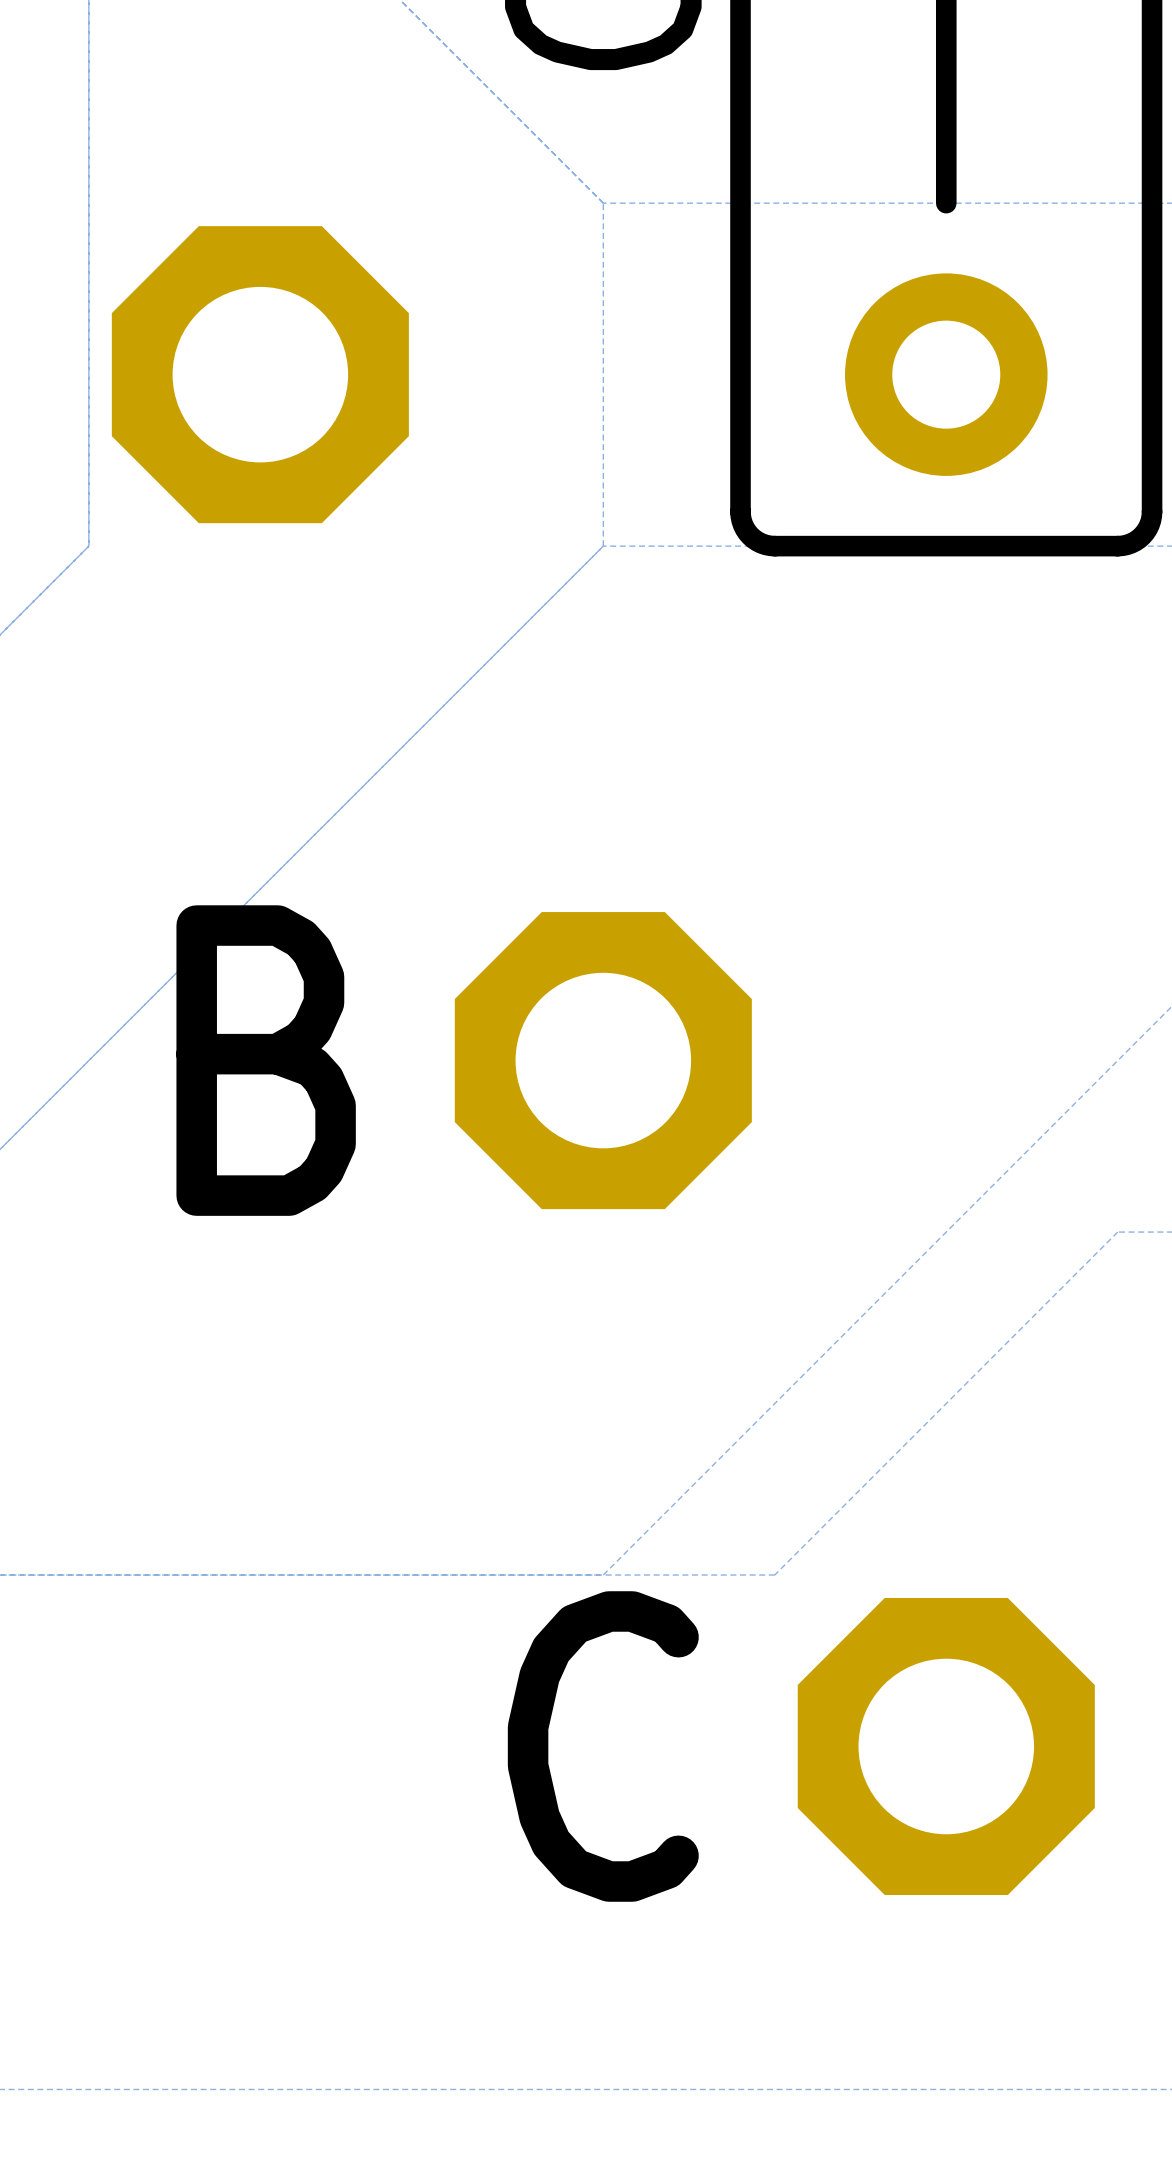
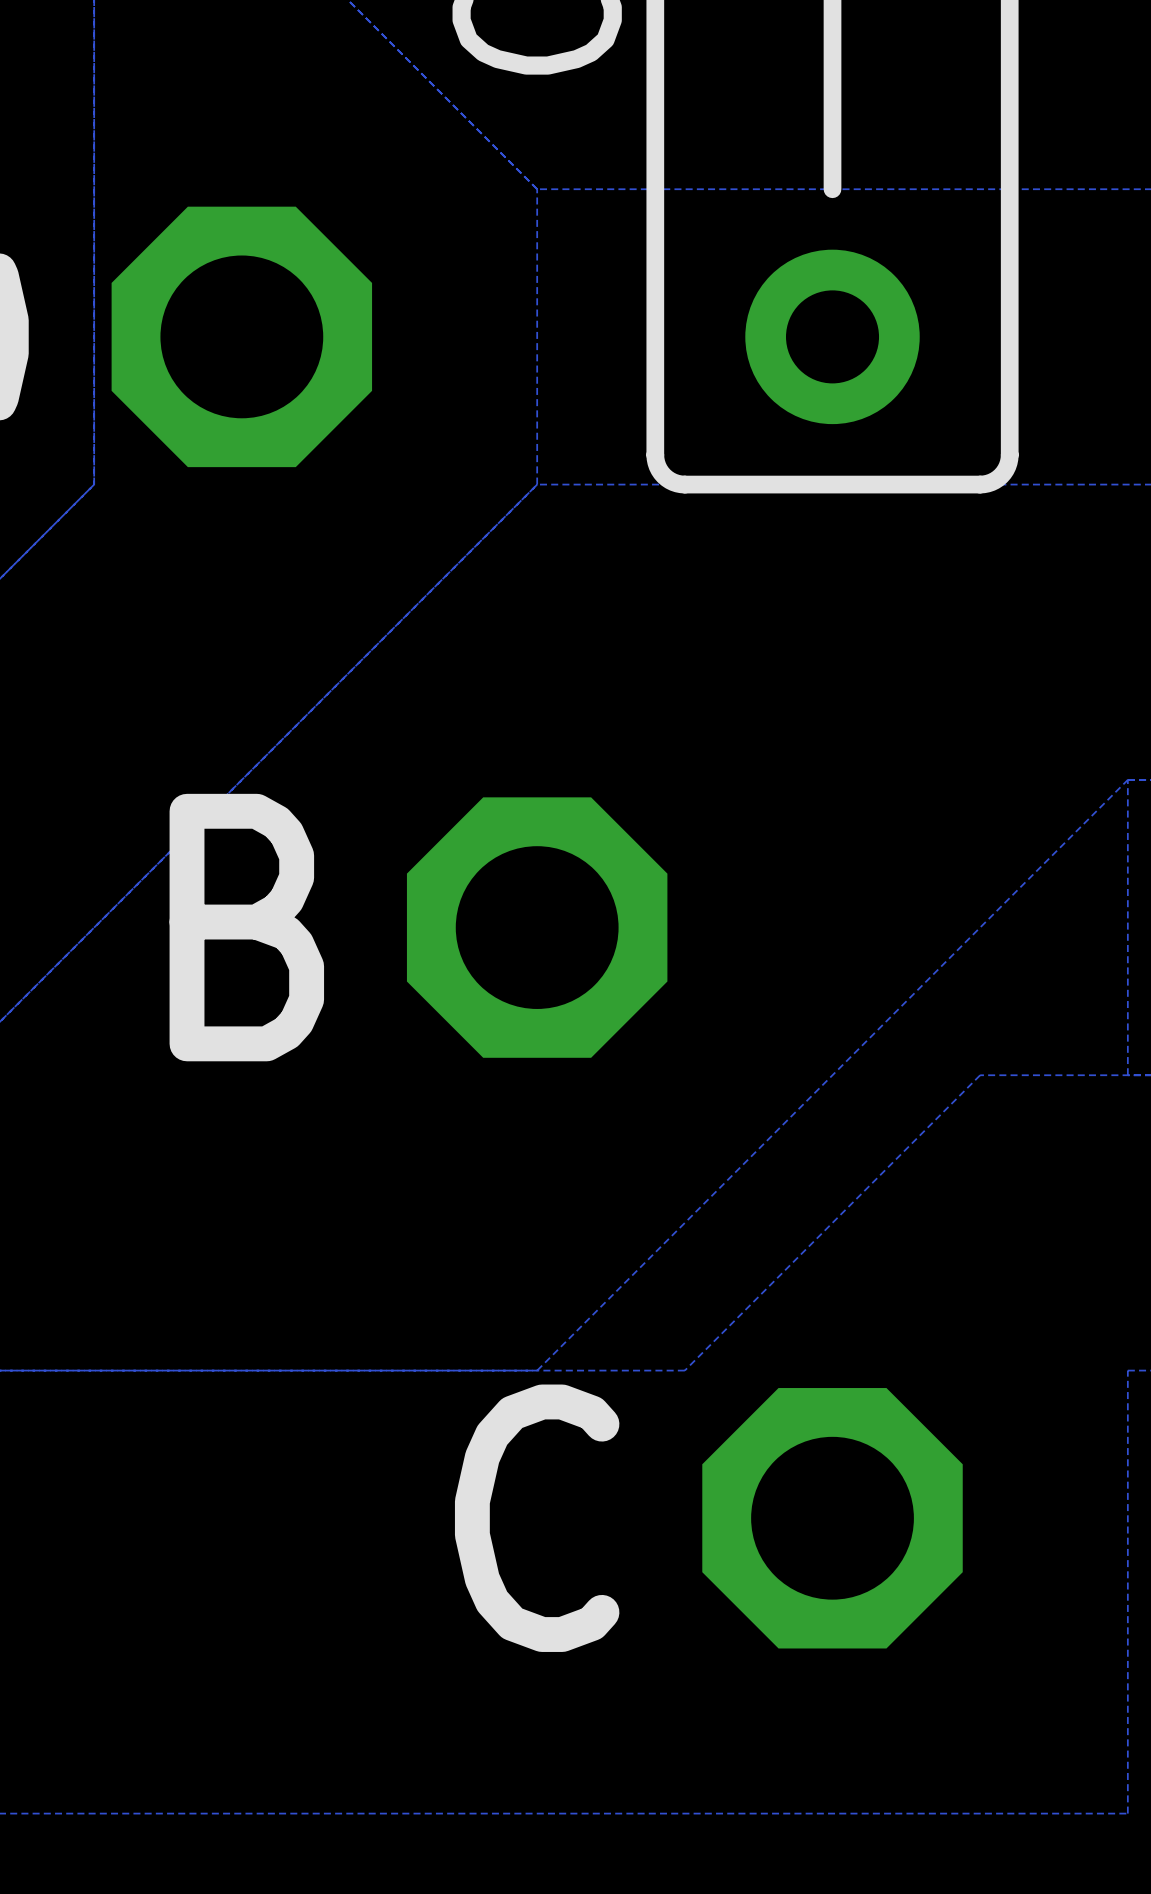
part footprint: [111, 226, 409, 524] -> [111, 206, 373, 468]
part footprint: [454, 912, 752, 1210] -> [406, 797, 668, 1058]
part footprint: [797, 1597, 1095, 1896] -> [702, 1388, 963, 1649]

